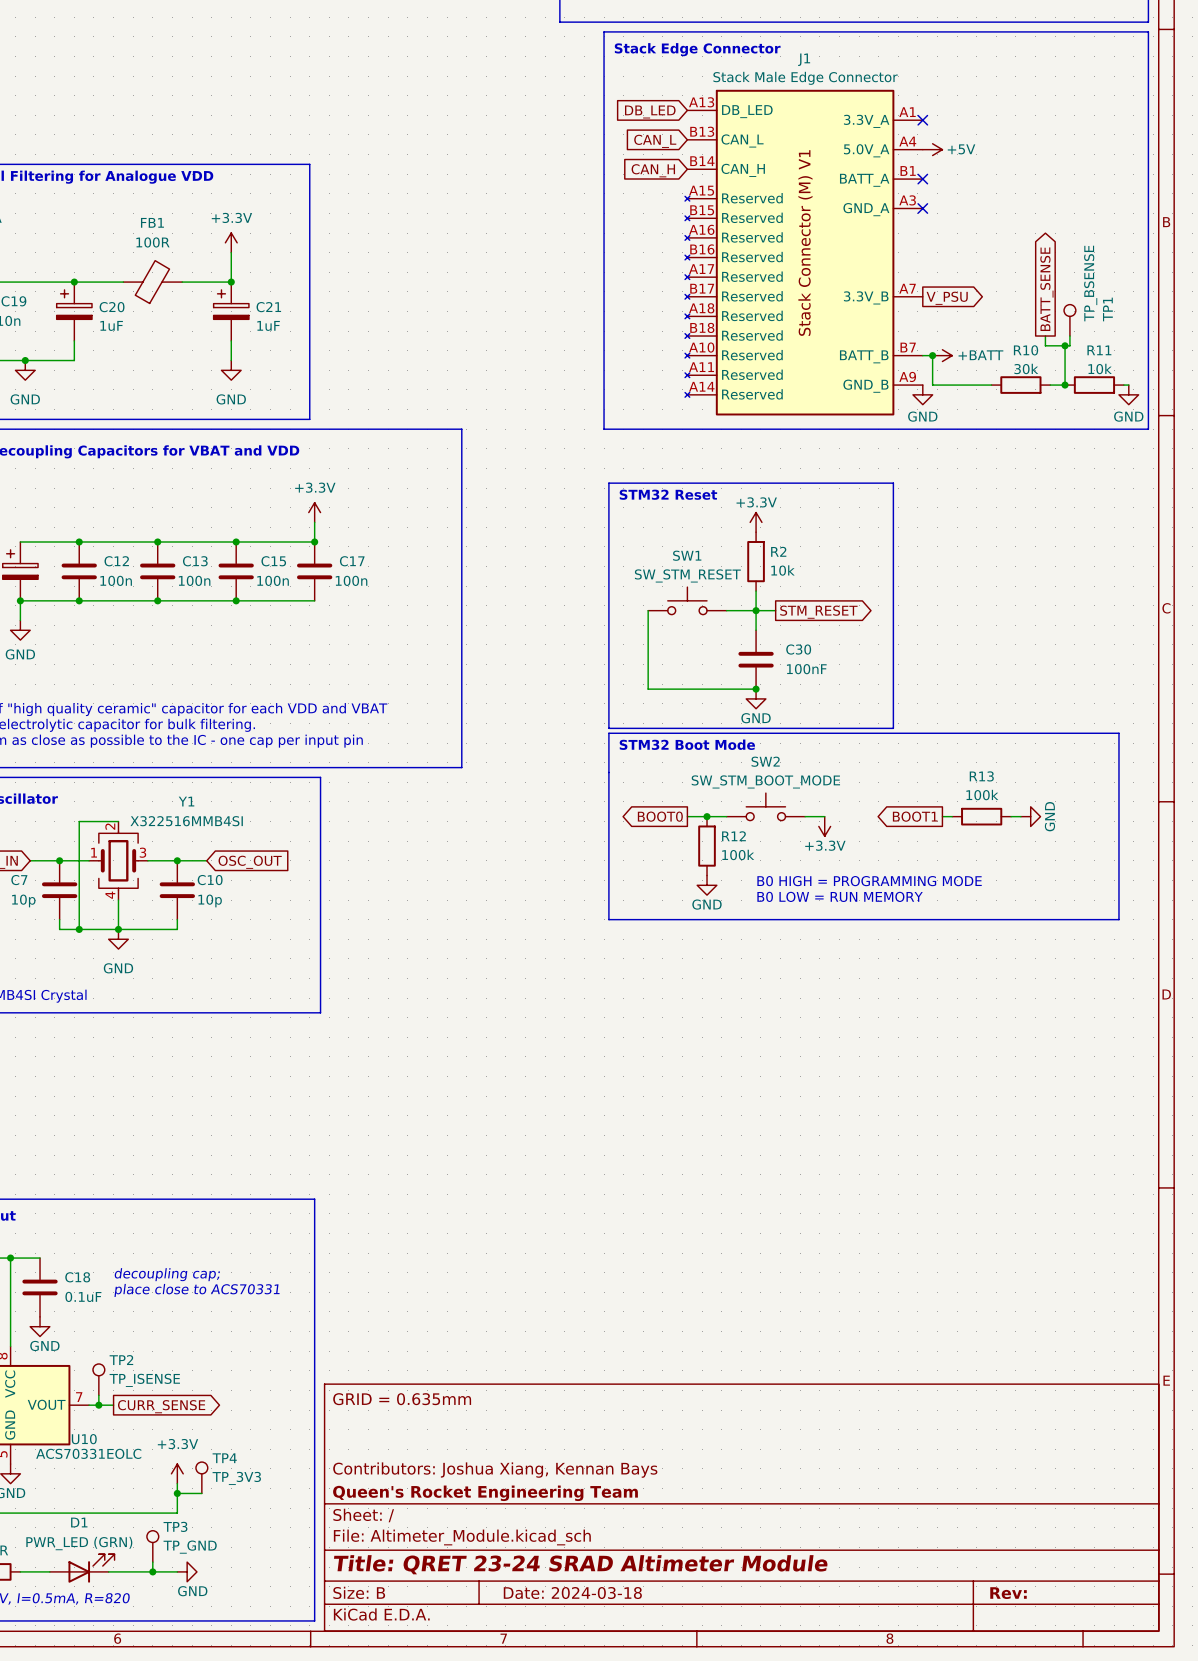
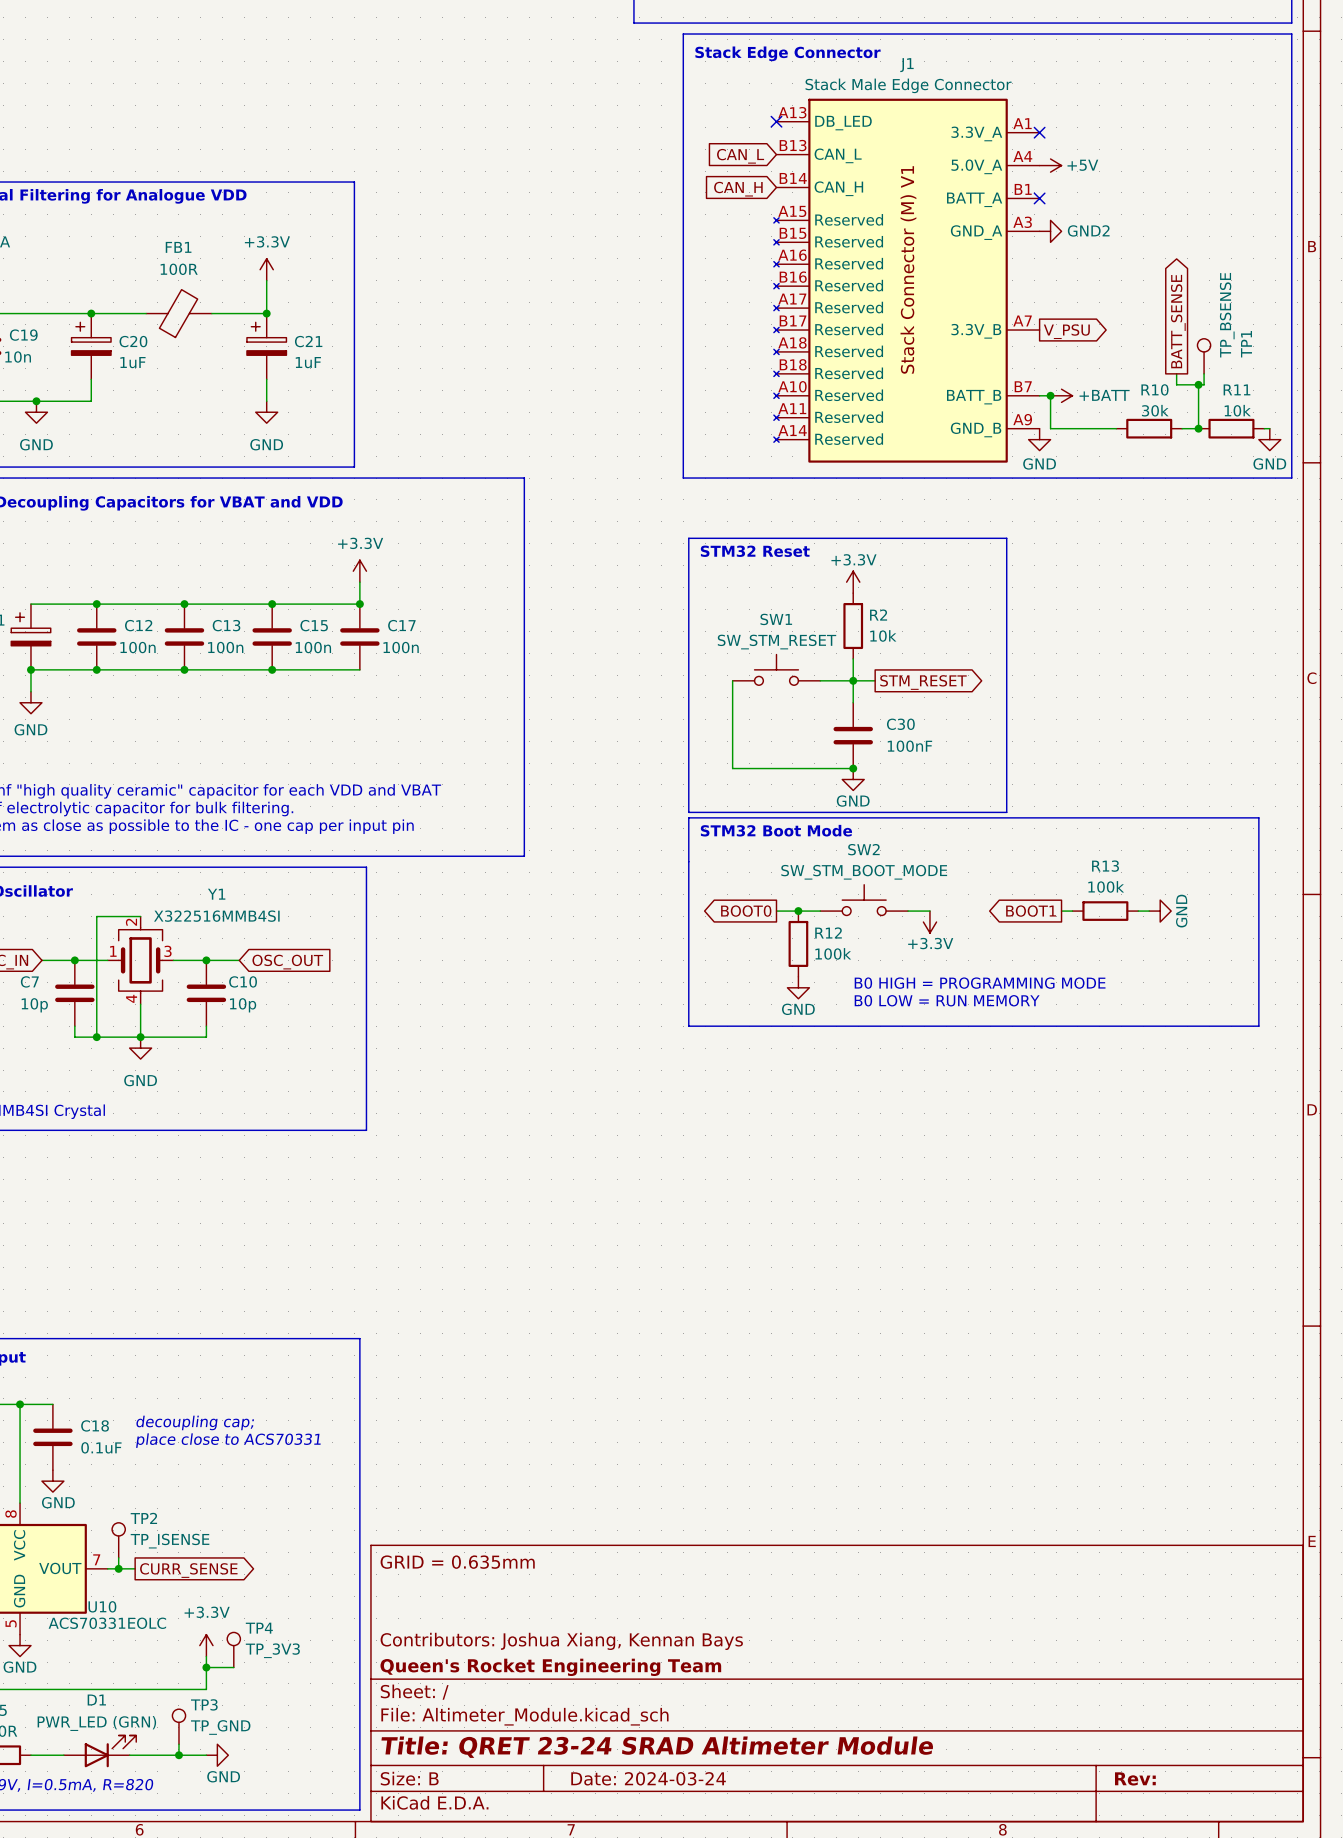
no-connect mark: none -> (776, 121)
global label: DB_LED (650, 111) -> none
no-connect mark: (922, 208) -> none
power symbol: none -> GND2 (1050, 231)
title block: Date: 2024-03-18 (572, 1593) -> Date: 2024-03-24 (648, 1778)

